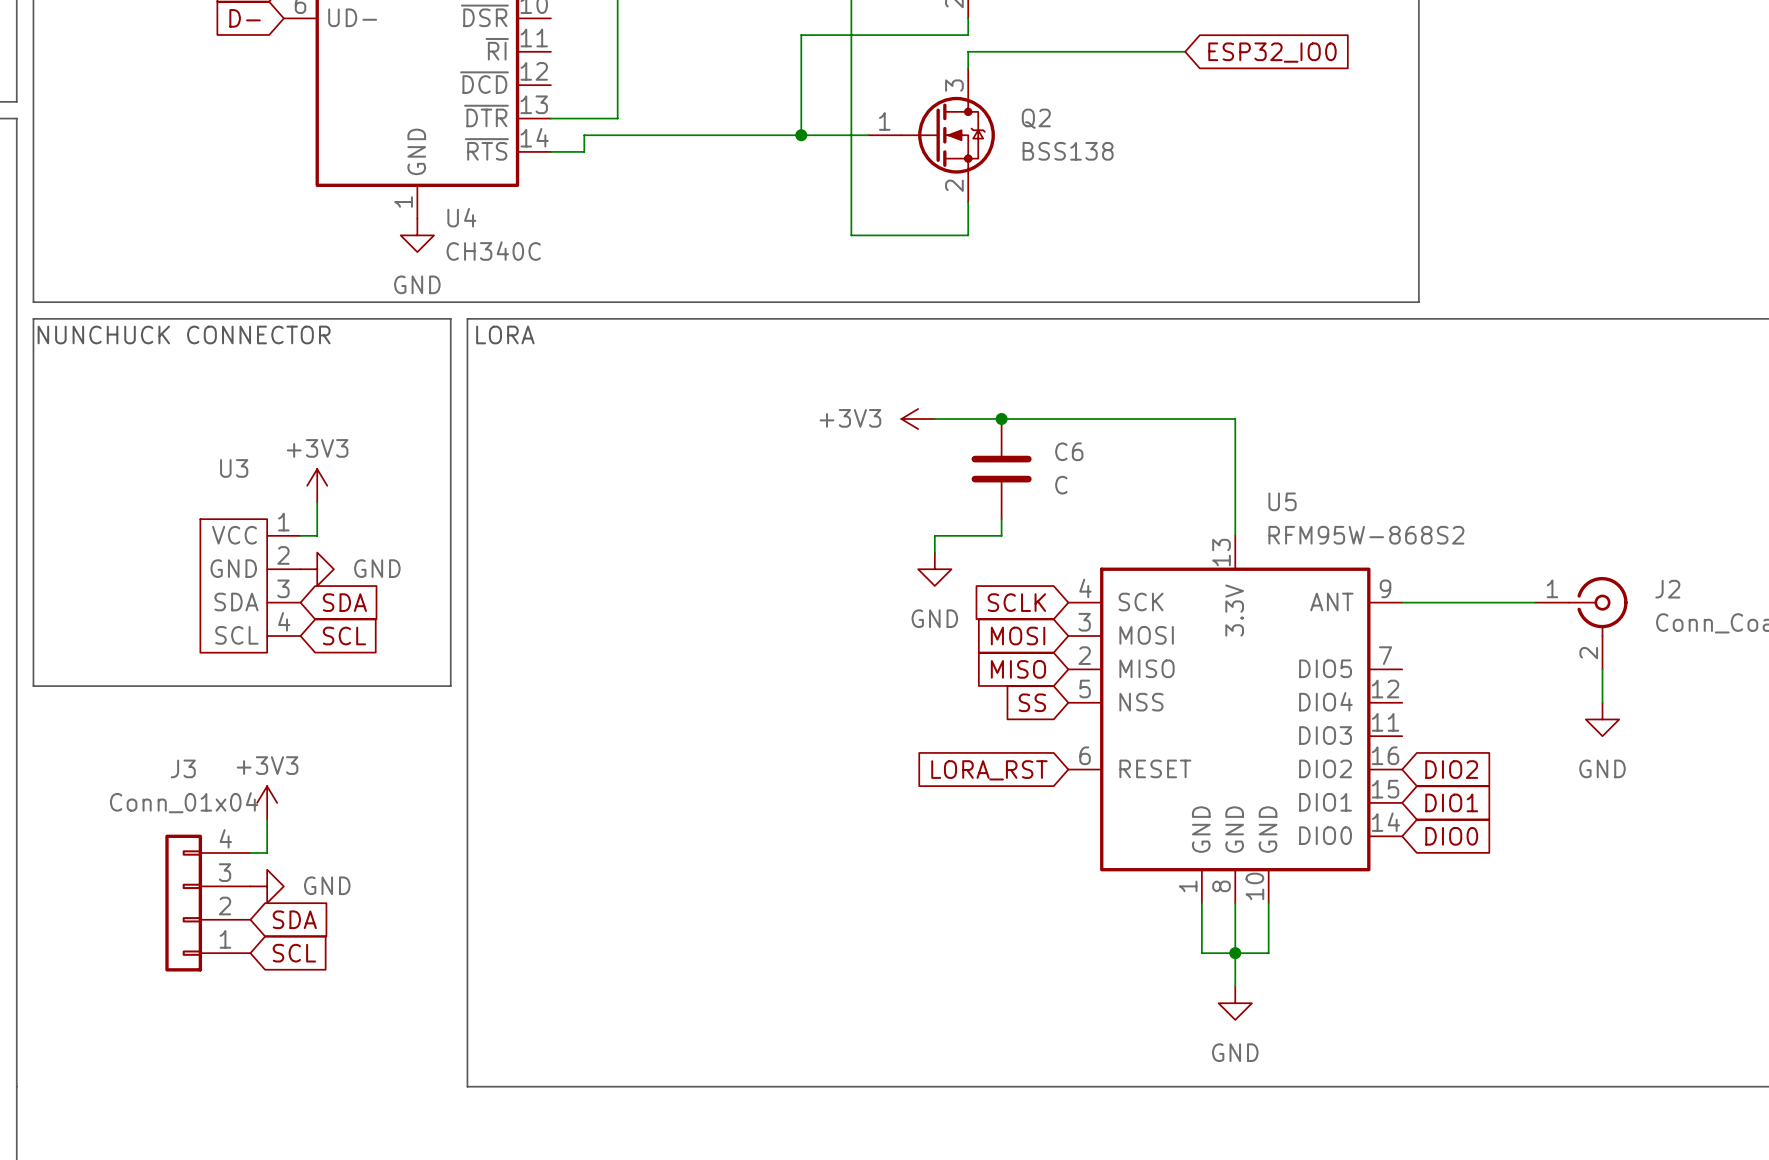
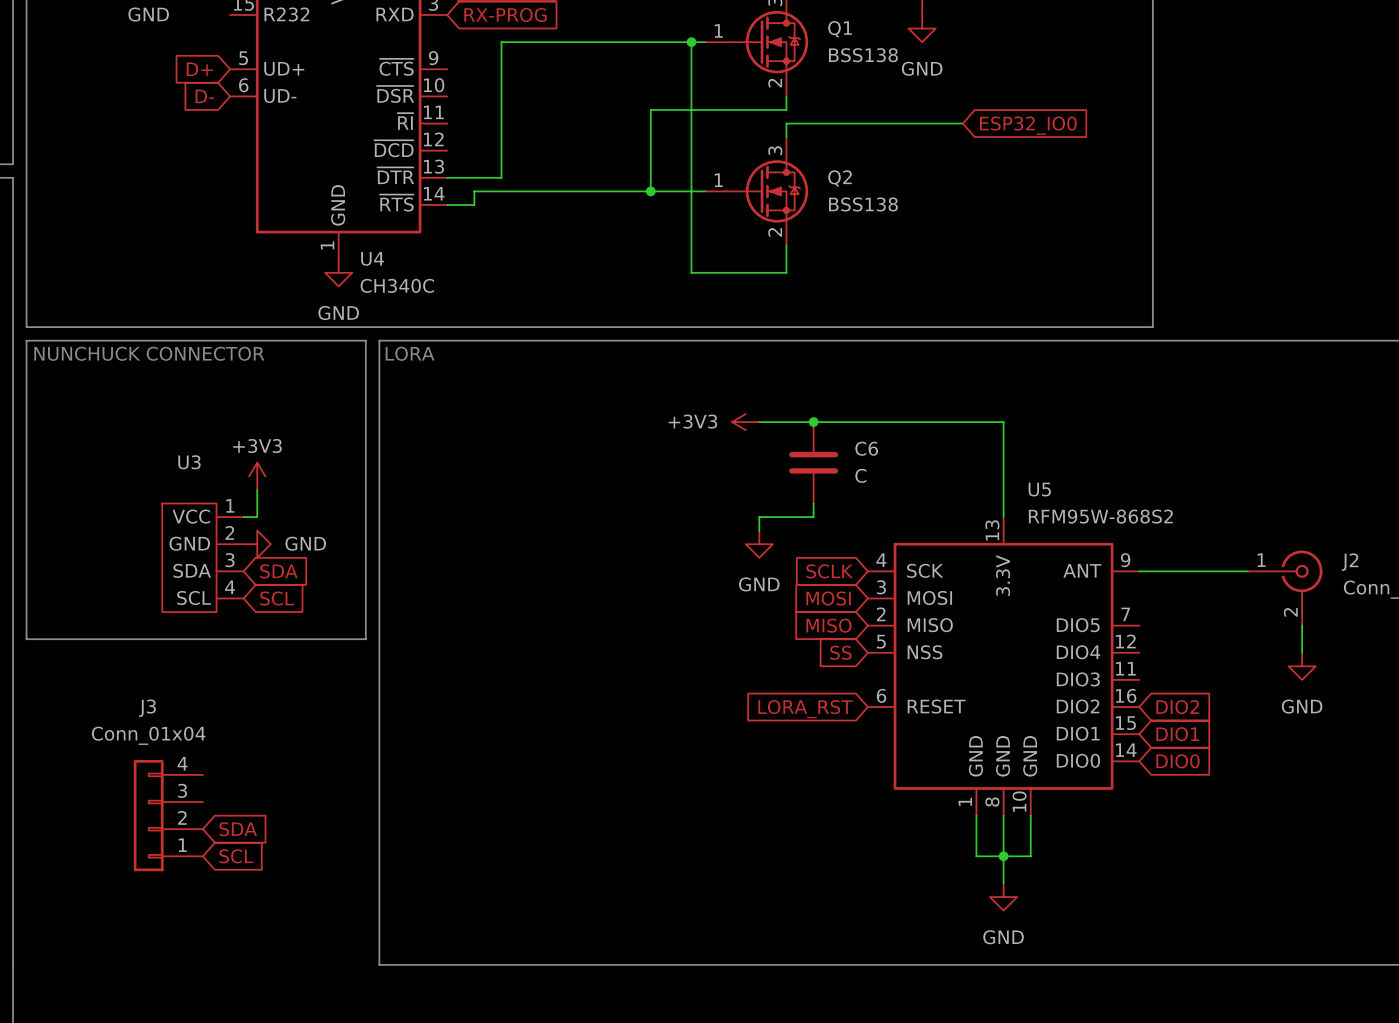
power symbol: +3V3 (267, 802) -> none
wire: (267, 819) (267, 853) (250, 853) -> none
power symbol: GND (267, 886) -> none

